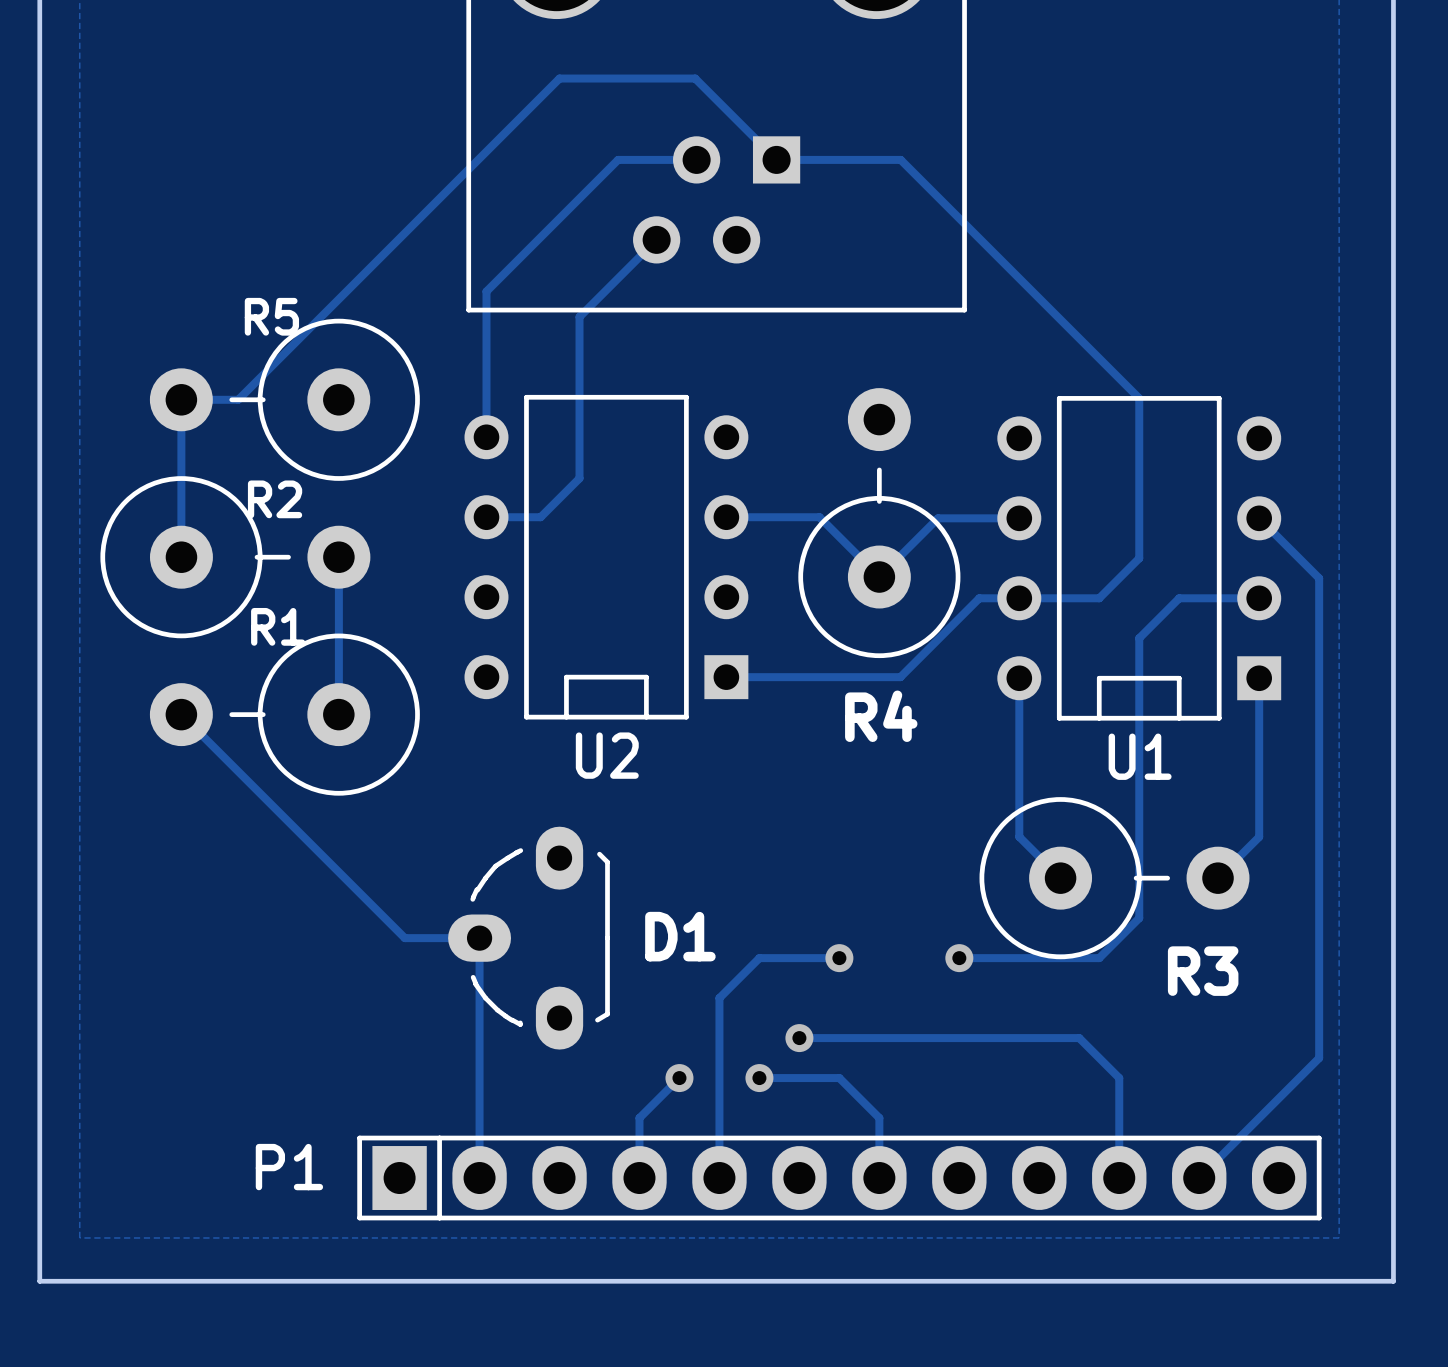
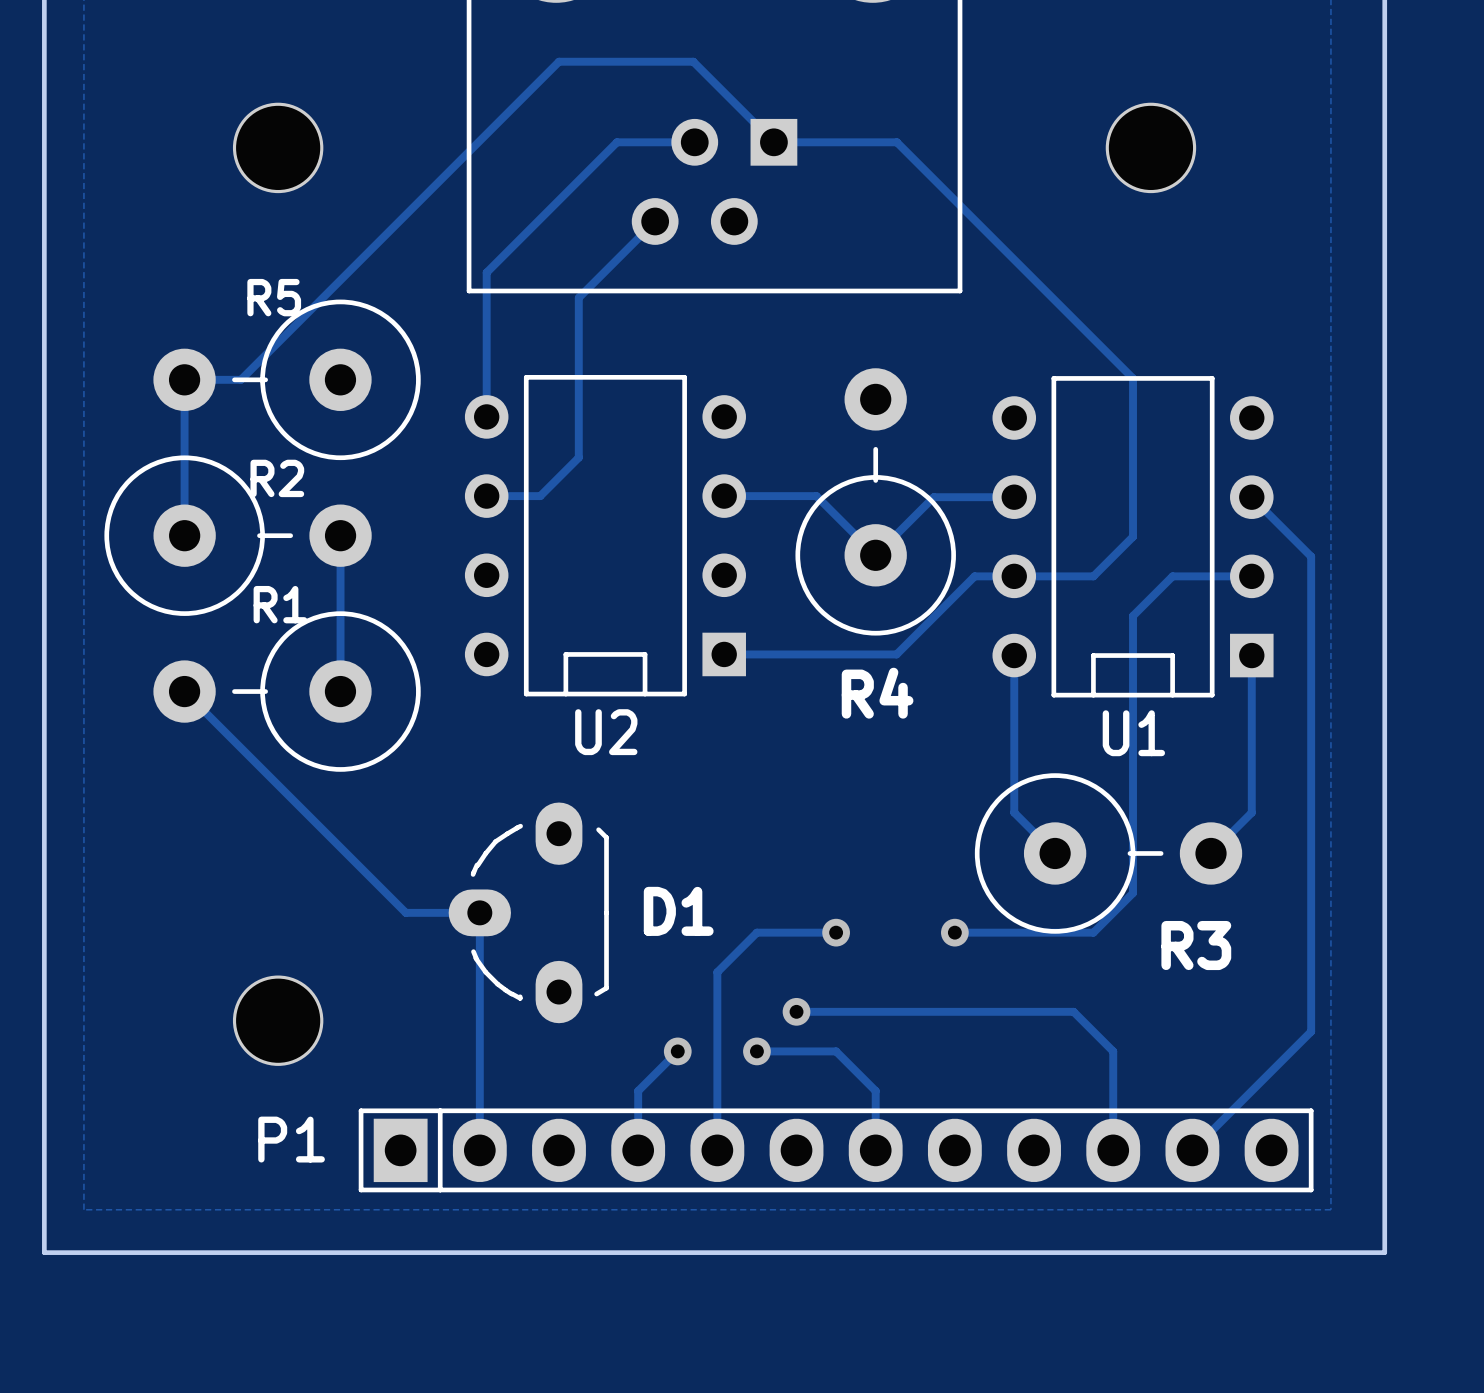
part: none -> (278, 147)
part: none -> (1150, 147)
part: none -> (278, 1020)

